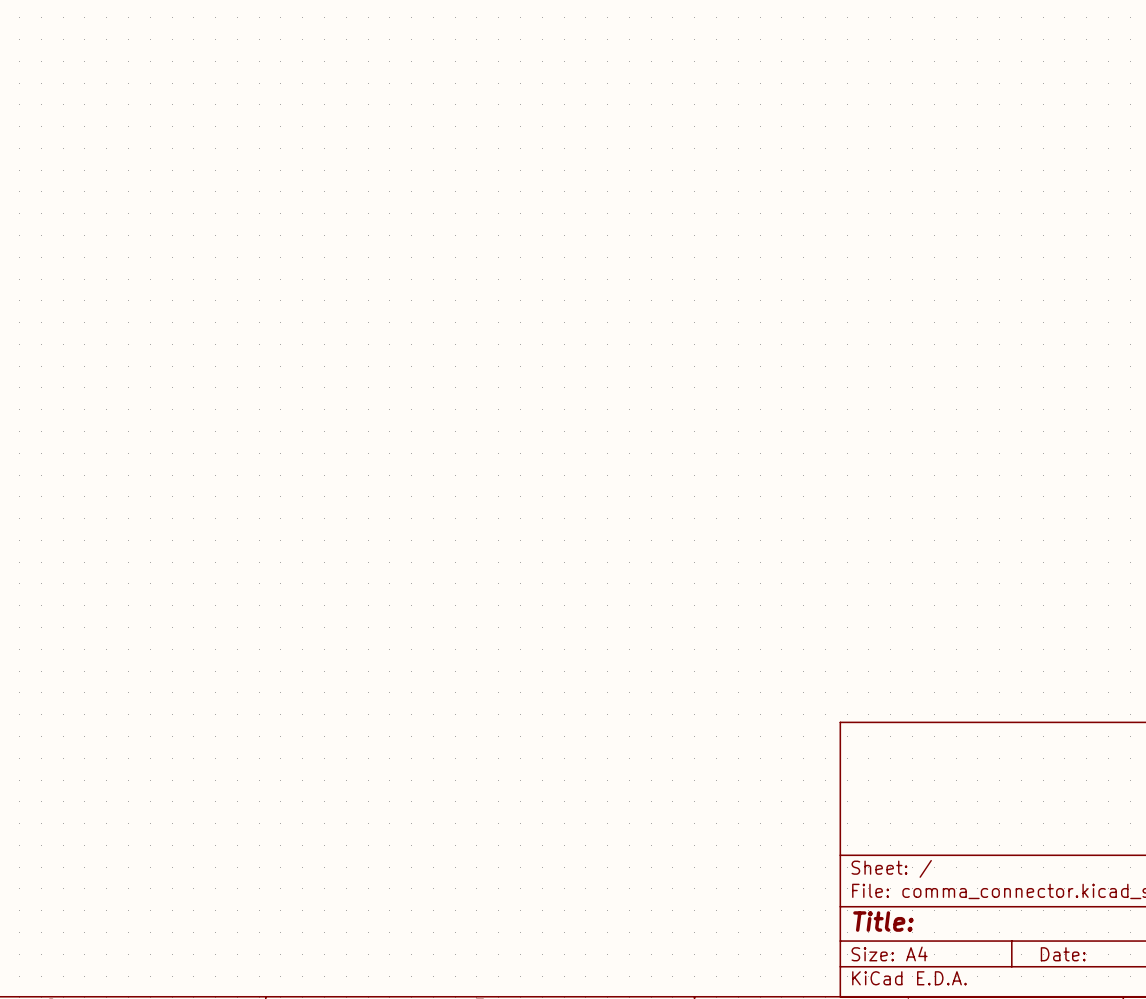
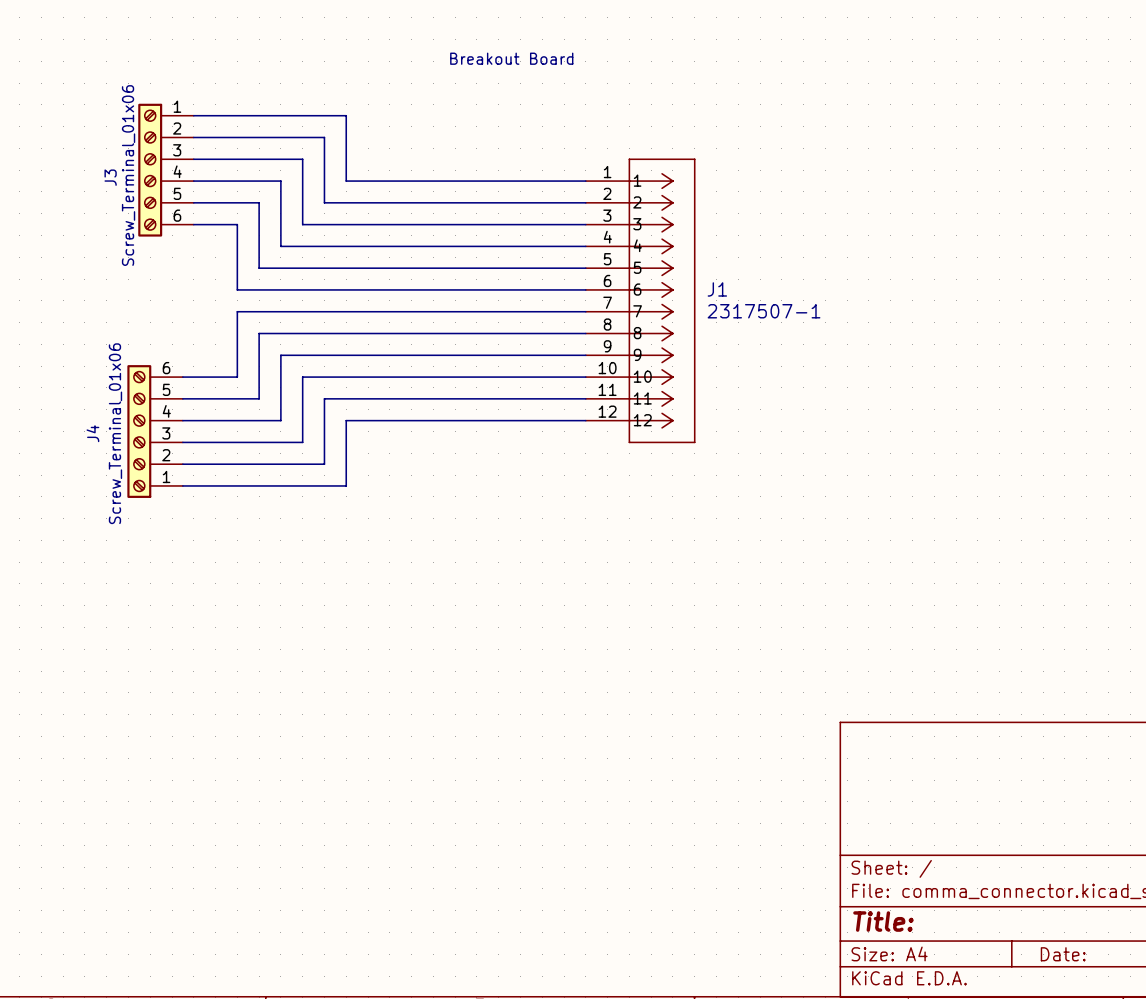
text: none -> Breakout Board (511, 58)
wire: none -> (193, 115) (346, 115) (346, 181) (585, 181)
wire: none -> (193, 137) (324, 137) (324, 202) (585, 202)
wire: none -> (193, 159) (302, 159) (302, 224) (585, 224)
J3: none -> Screw_Terminal_01x06 (166, 170)
wire: none -> (193, 181) (280, 181) (280, 246) (585, 246)
wire: none -> (193, 202) (259, 202) (259, 268) (585, 268)
wire: none -> (193, 224) (237, 224) (237, 289) (585, 289)
J1: none -> 2317507-1 (640, 300)
wire: none -> (585, 311) (237, 311) (237, 377) (182, 377)
wire: none -> (585, 333) (259, 333) (259, 398) (182, 398)
wire: none -> (585, 355) (280, 355) (280, 420) (182, 420)
wire: none -> (585, 377) (302, 377) (302, 442) (182, 442)
wire: none -> (585, 398) (324, 398) (324, 464) (182, 464)
wire: none -> (585, 420) (346, 420) (346, 485) (182, 485)
J4: none -> Screw_Terminal_01x06 (155, 431)

